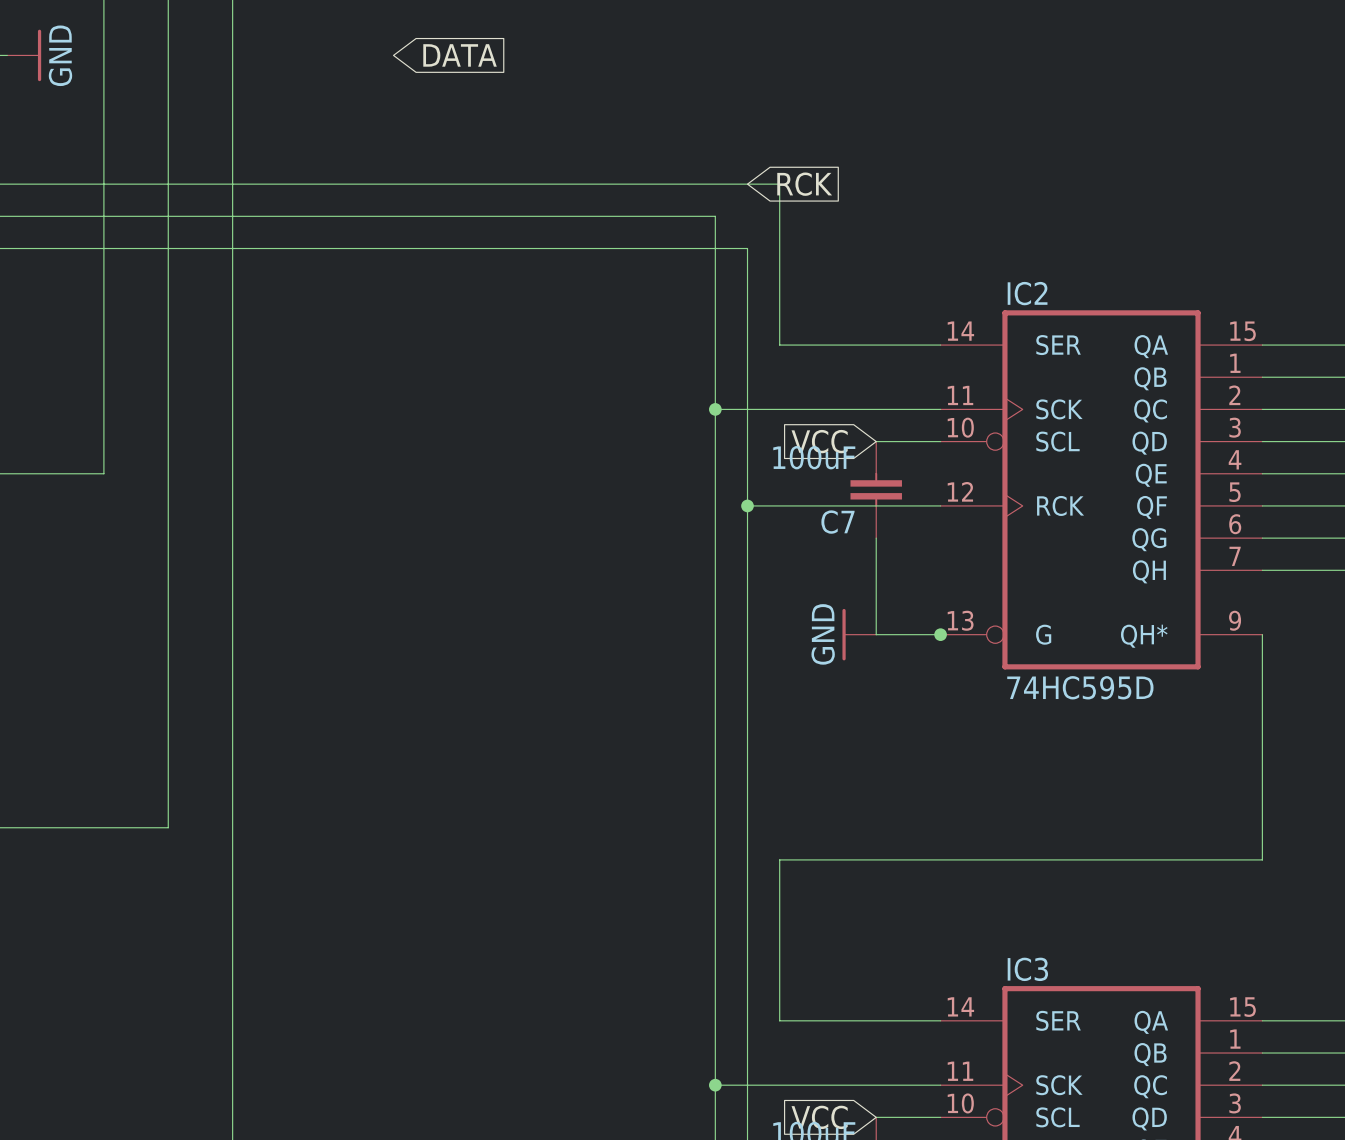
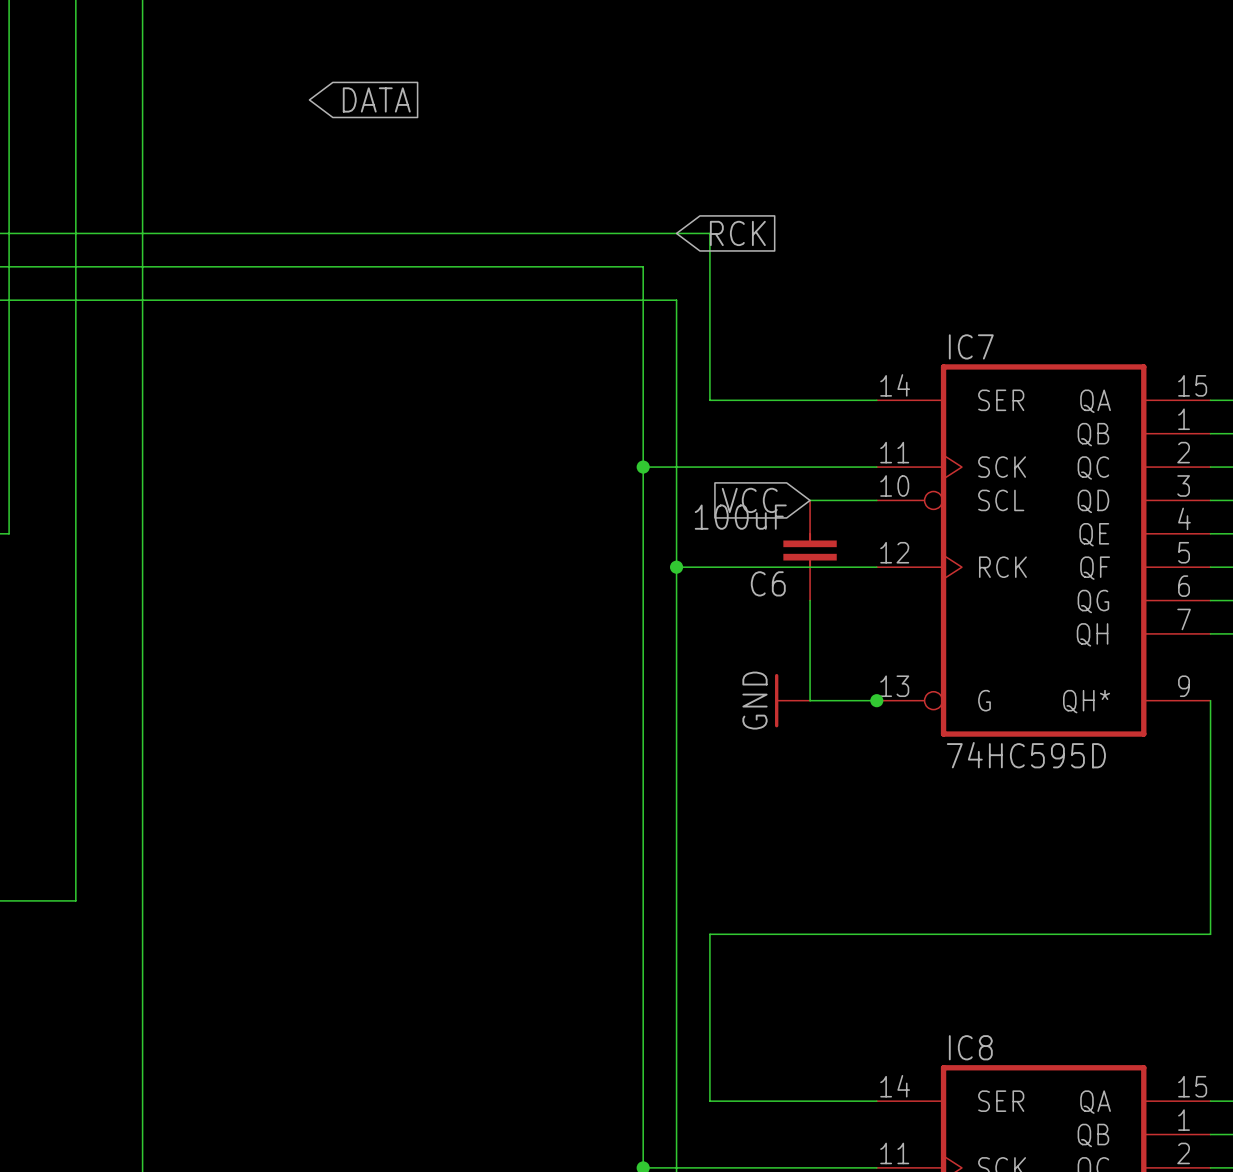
IC2 name: IC2 (1027, 293) -> IC7 (971, 346)
C7 name: C7 (837, 522) -> C6 (768, 583)
IC3 name: IC3 (1027, 969) -> IC8 (970, 1047)

